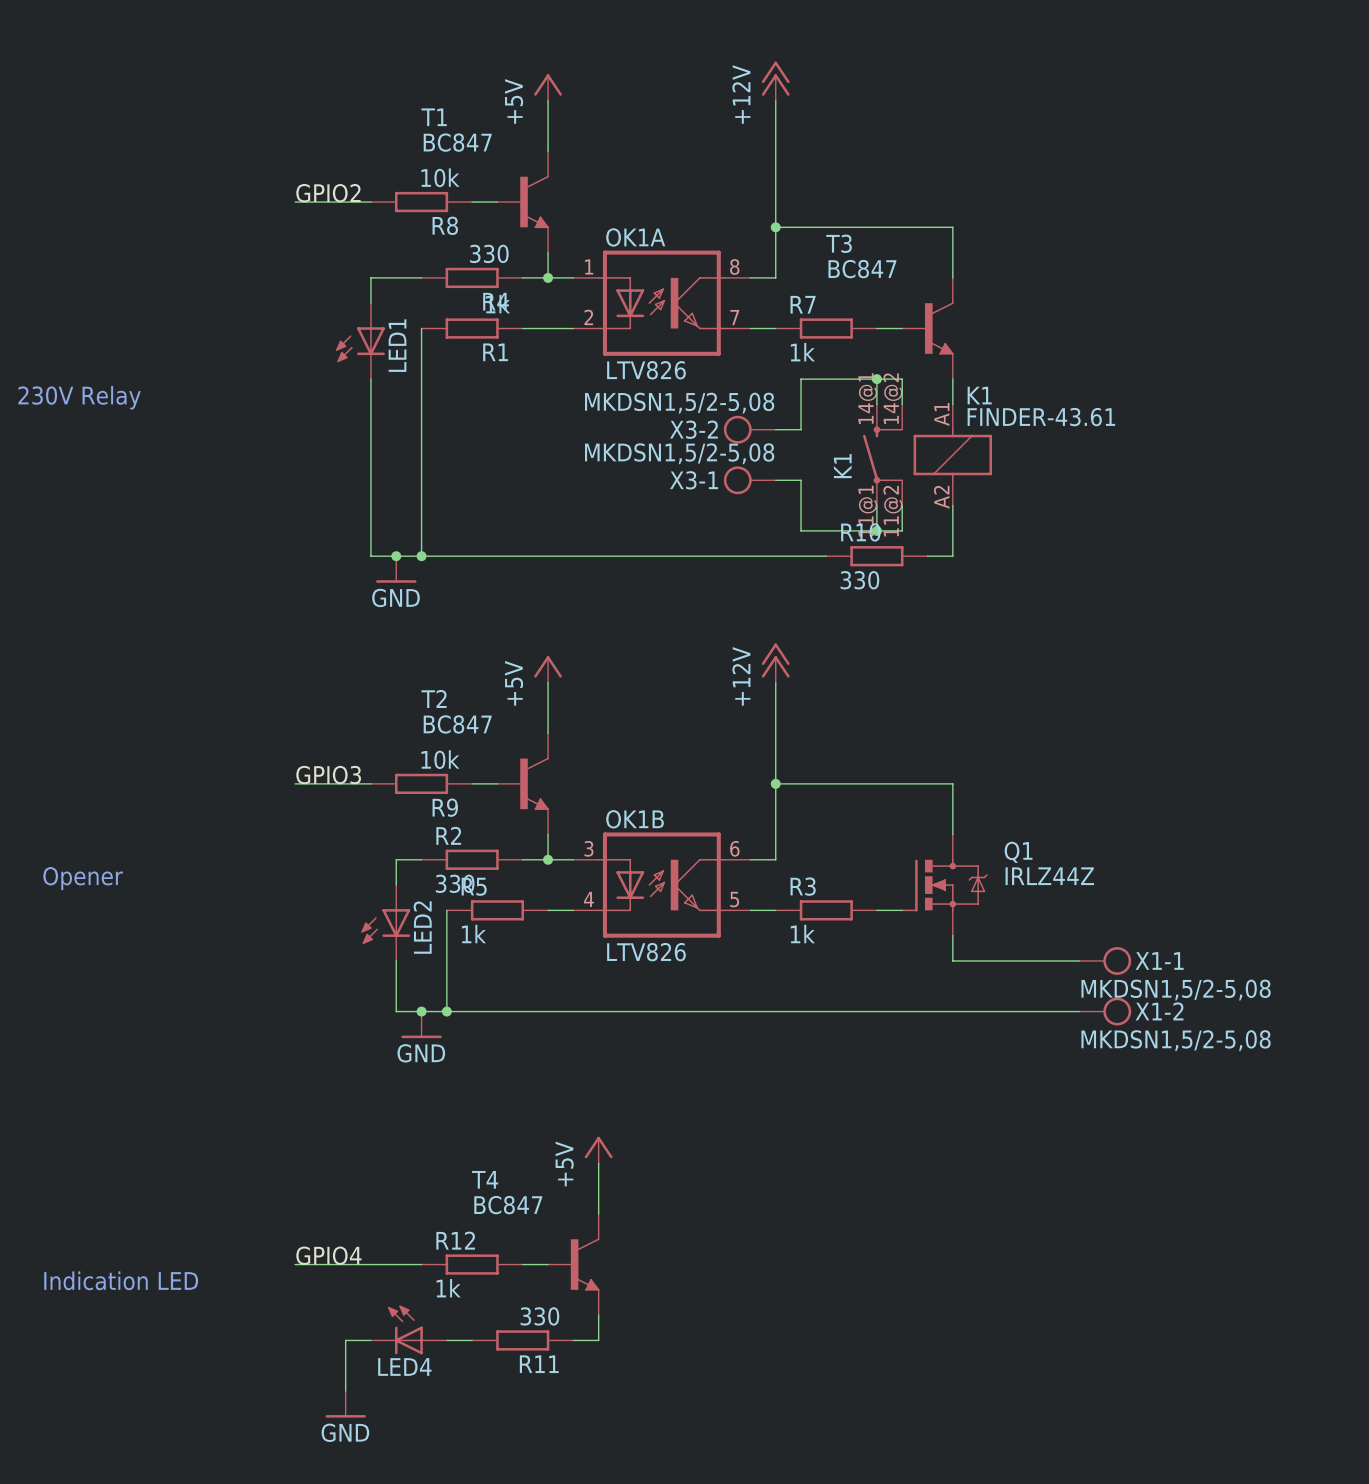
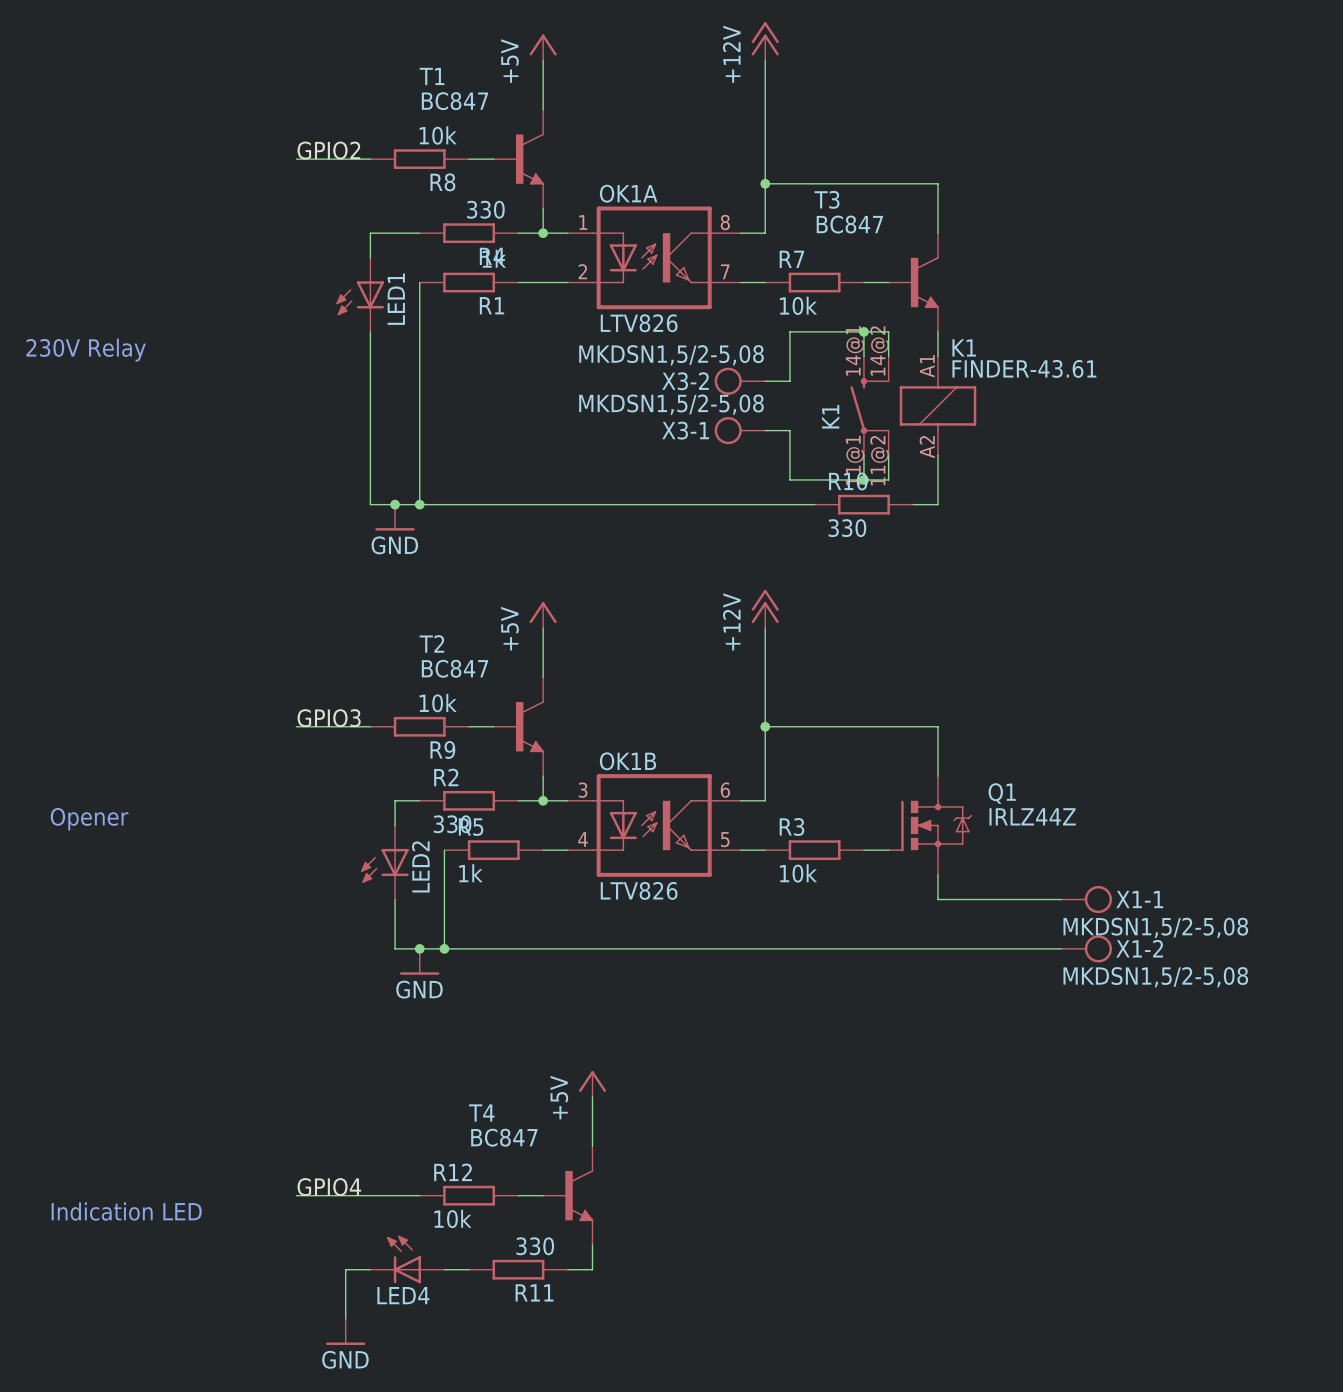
R7 value: 1k (802, 352) -> 10k (798, 305)
R3 value: 1k (802, 934) -> 10k (798, 873)
R12 value: 1k (448, 1288) -> 10k (452, 1218)

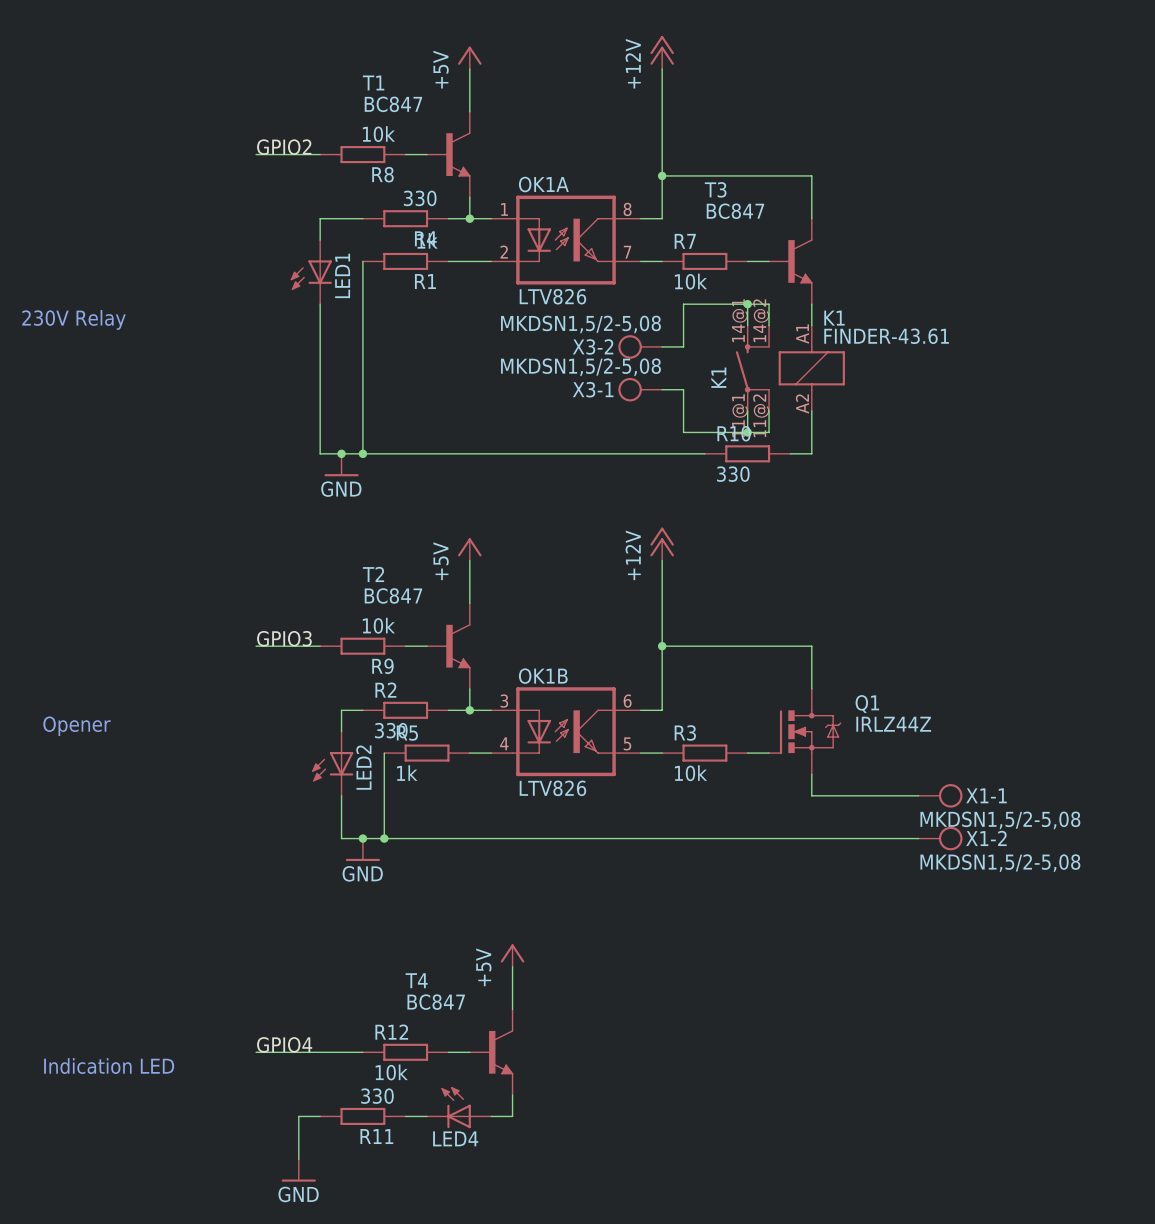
LED4 position: (407, 1259) -> (459, 1107)
R11 position: (518, 1269) -> (362, 1116)

